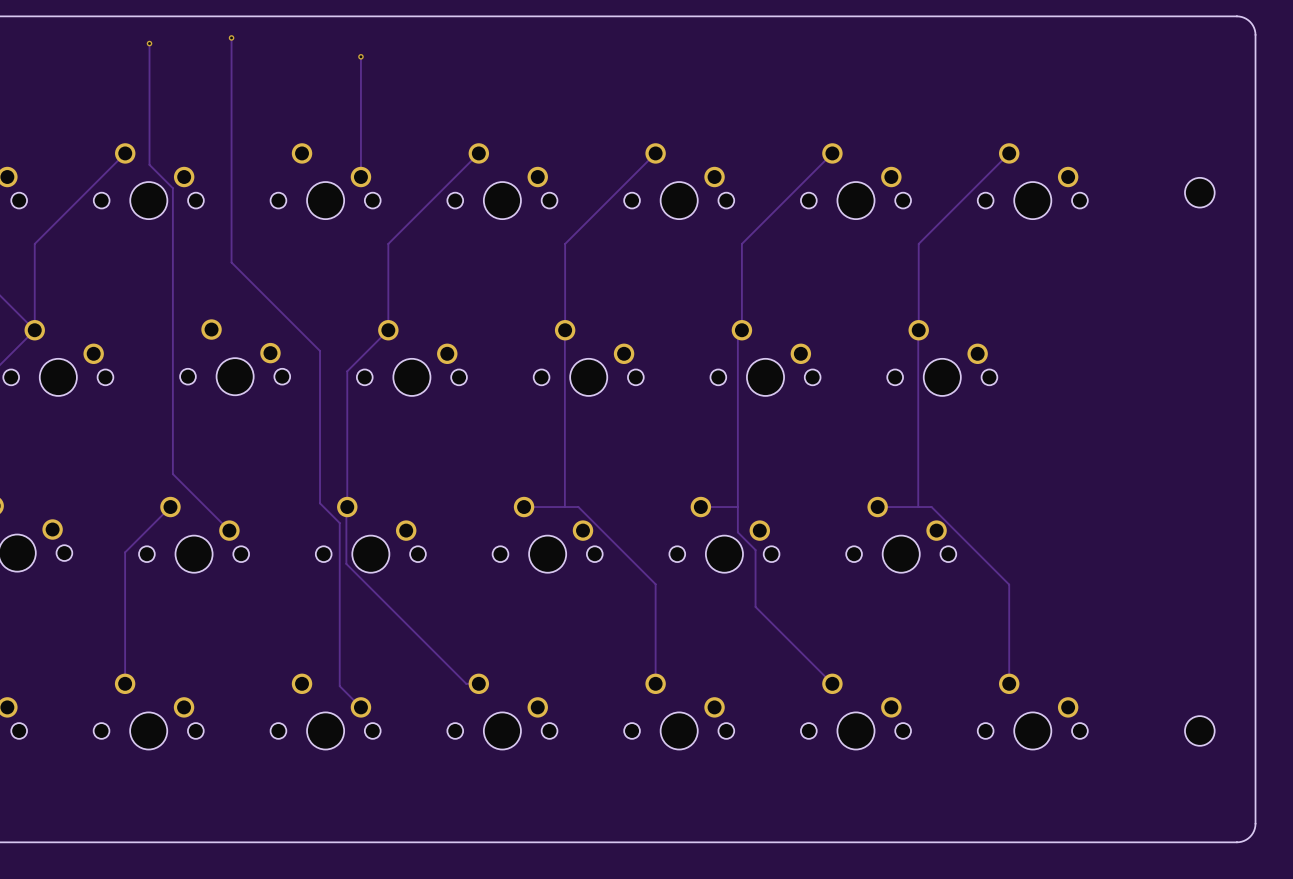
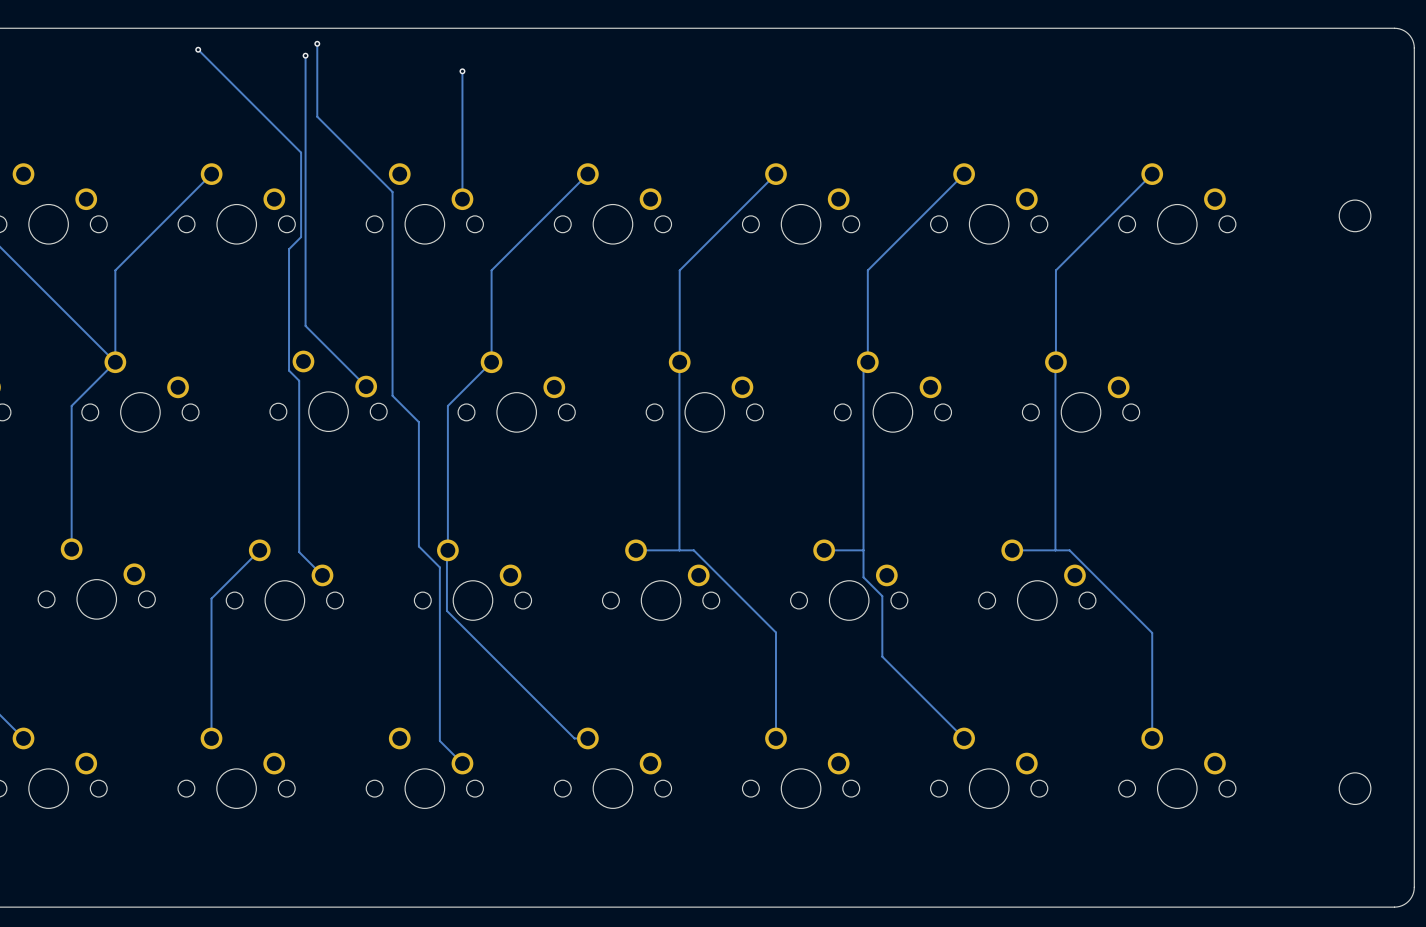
via: none -> (317, 43)
via: none -> (198, 49)
track: (231, 37) (231, 262) (320, 350) (320, 386) -> (317, 43) (317, 116) (392, 191) (392, 395) (418, 422)
via: (231, 37) -> none
track: none -> (305, 55) (305, 325) (366, 386)
via: none -> (305, 55)
track: (149, 43) (149, 164) (172, 188) (172, 474) (207, 508) -> (198, 49) (301, 152) (301, 237) (289, 249) (289, 370) (299, 380) (299, 552)
via: (149, 43) -> none

